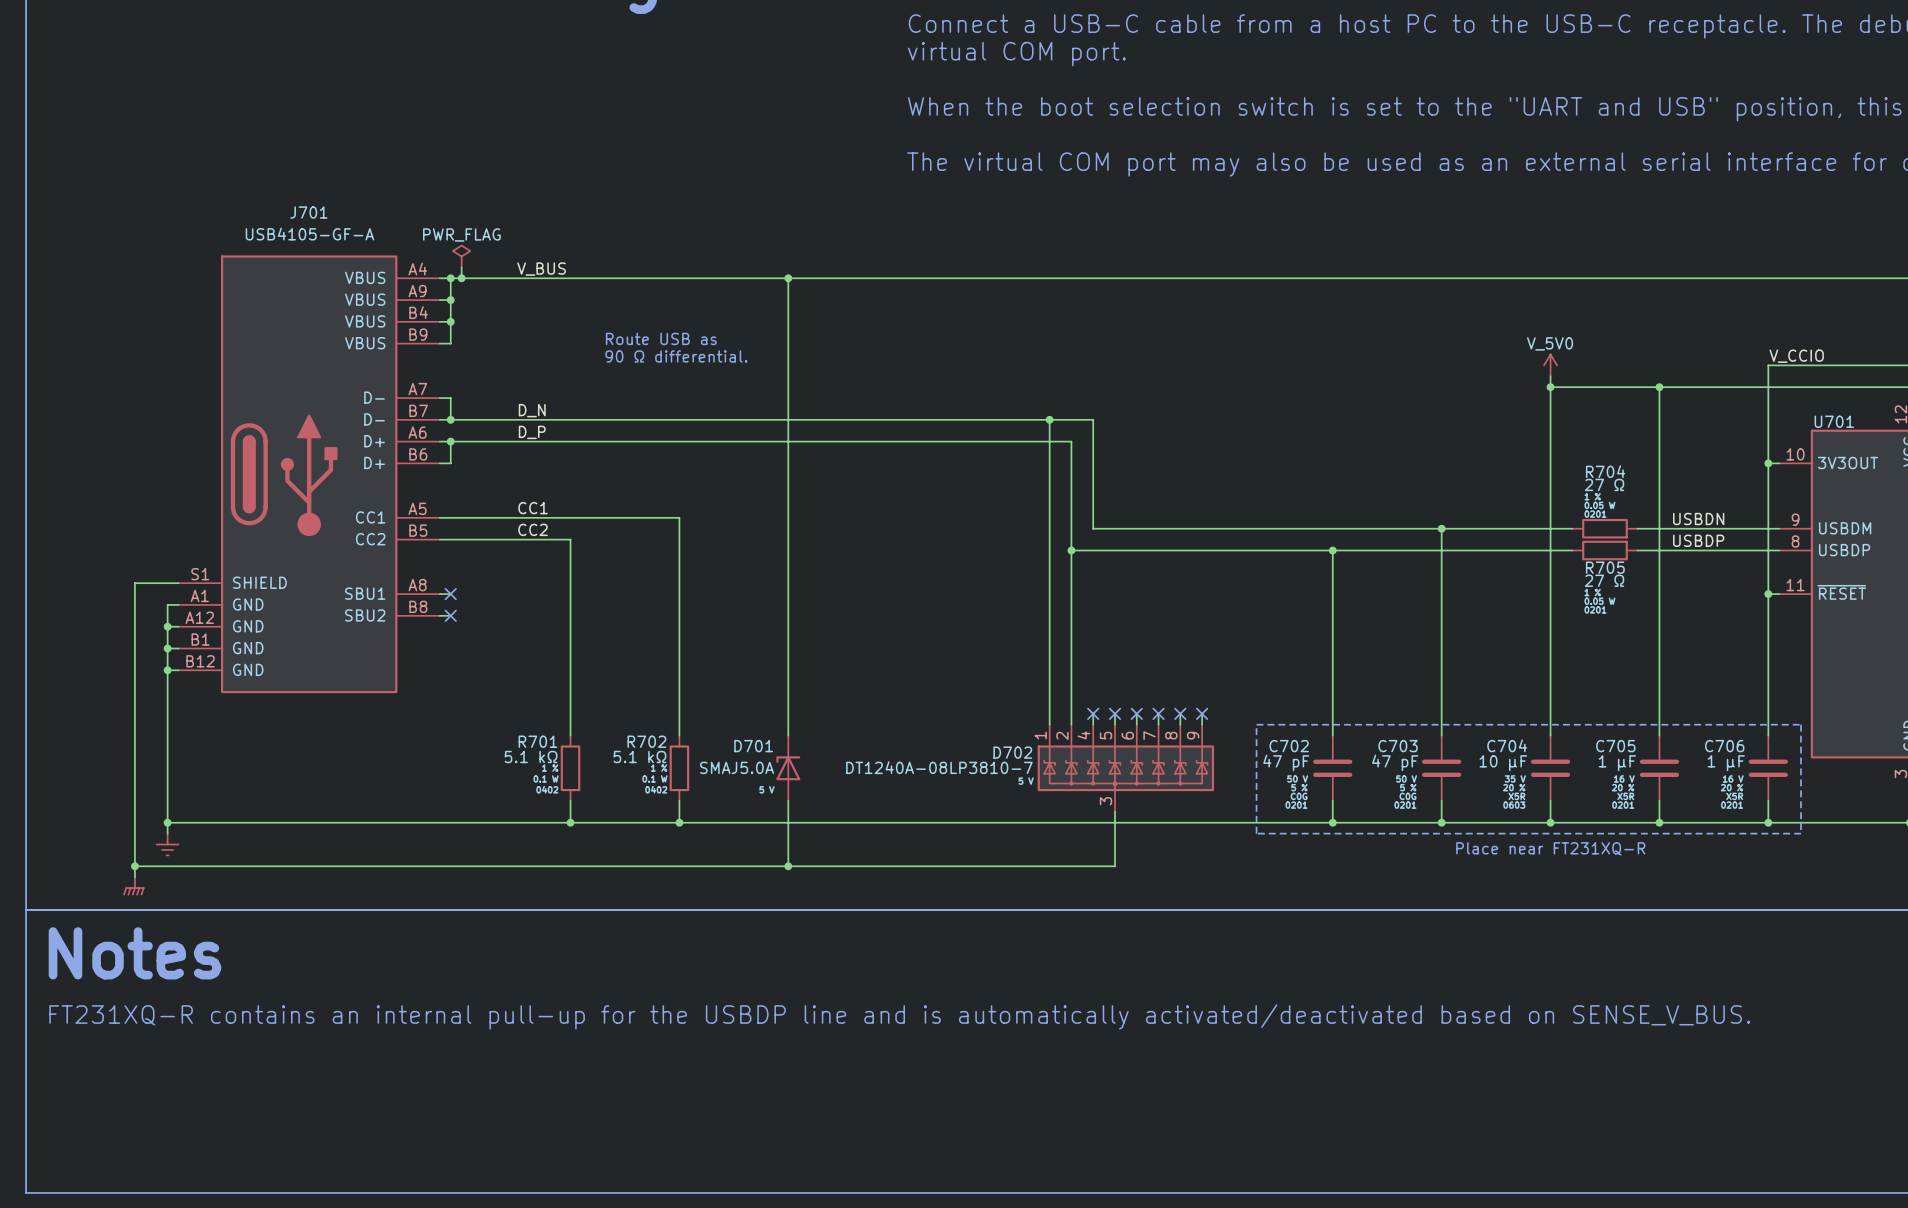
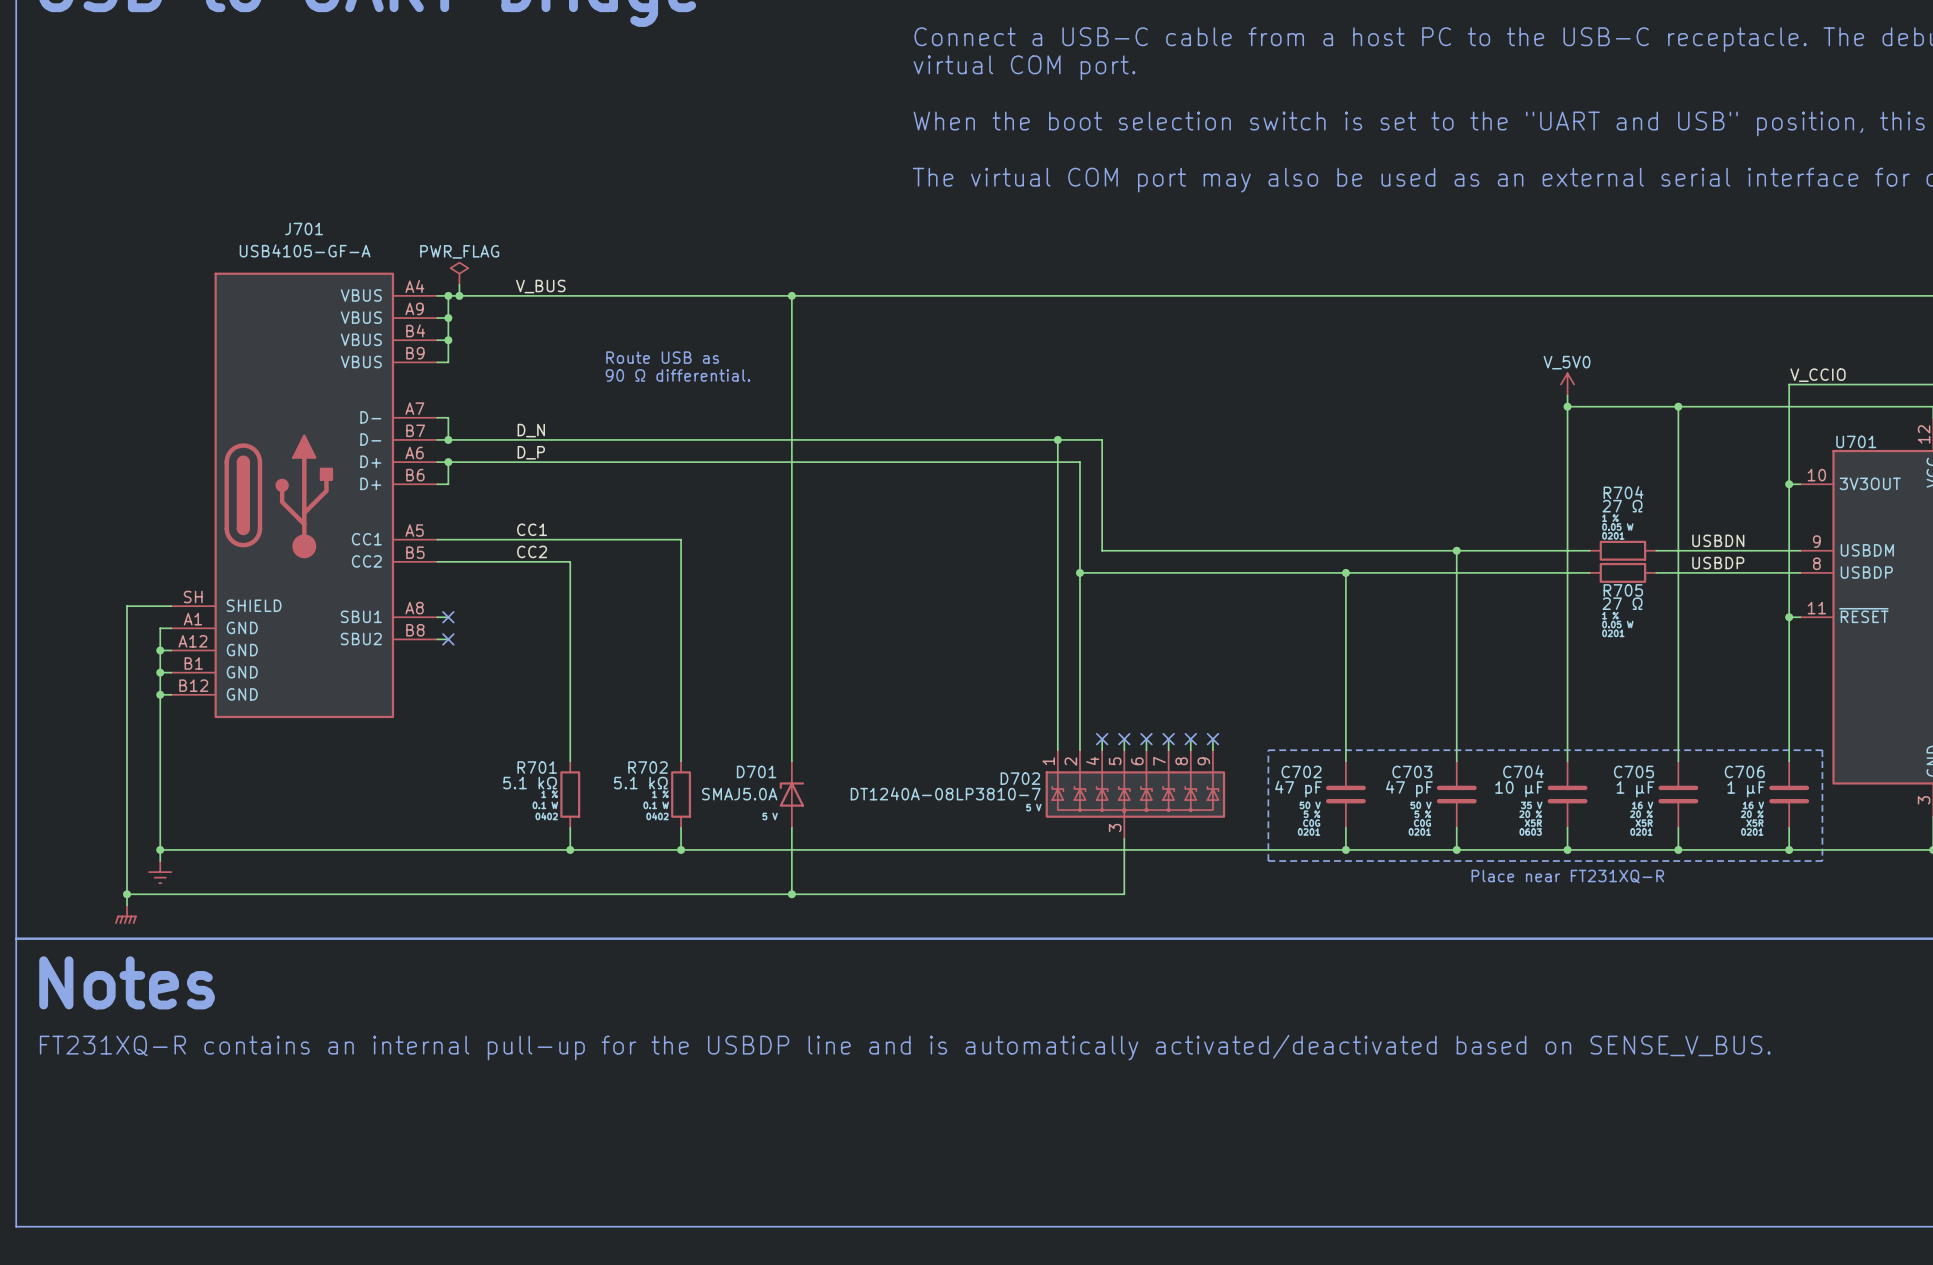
J701 pin number: S1 (200, 574) -> SH (193, 597)

